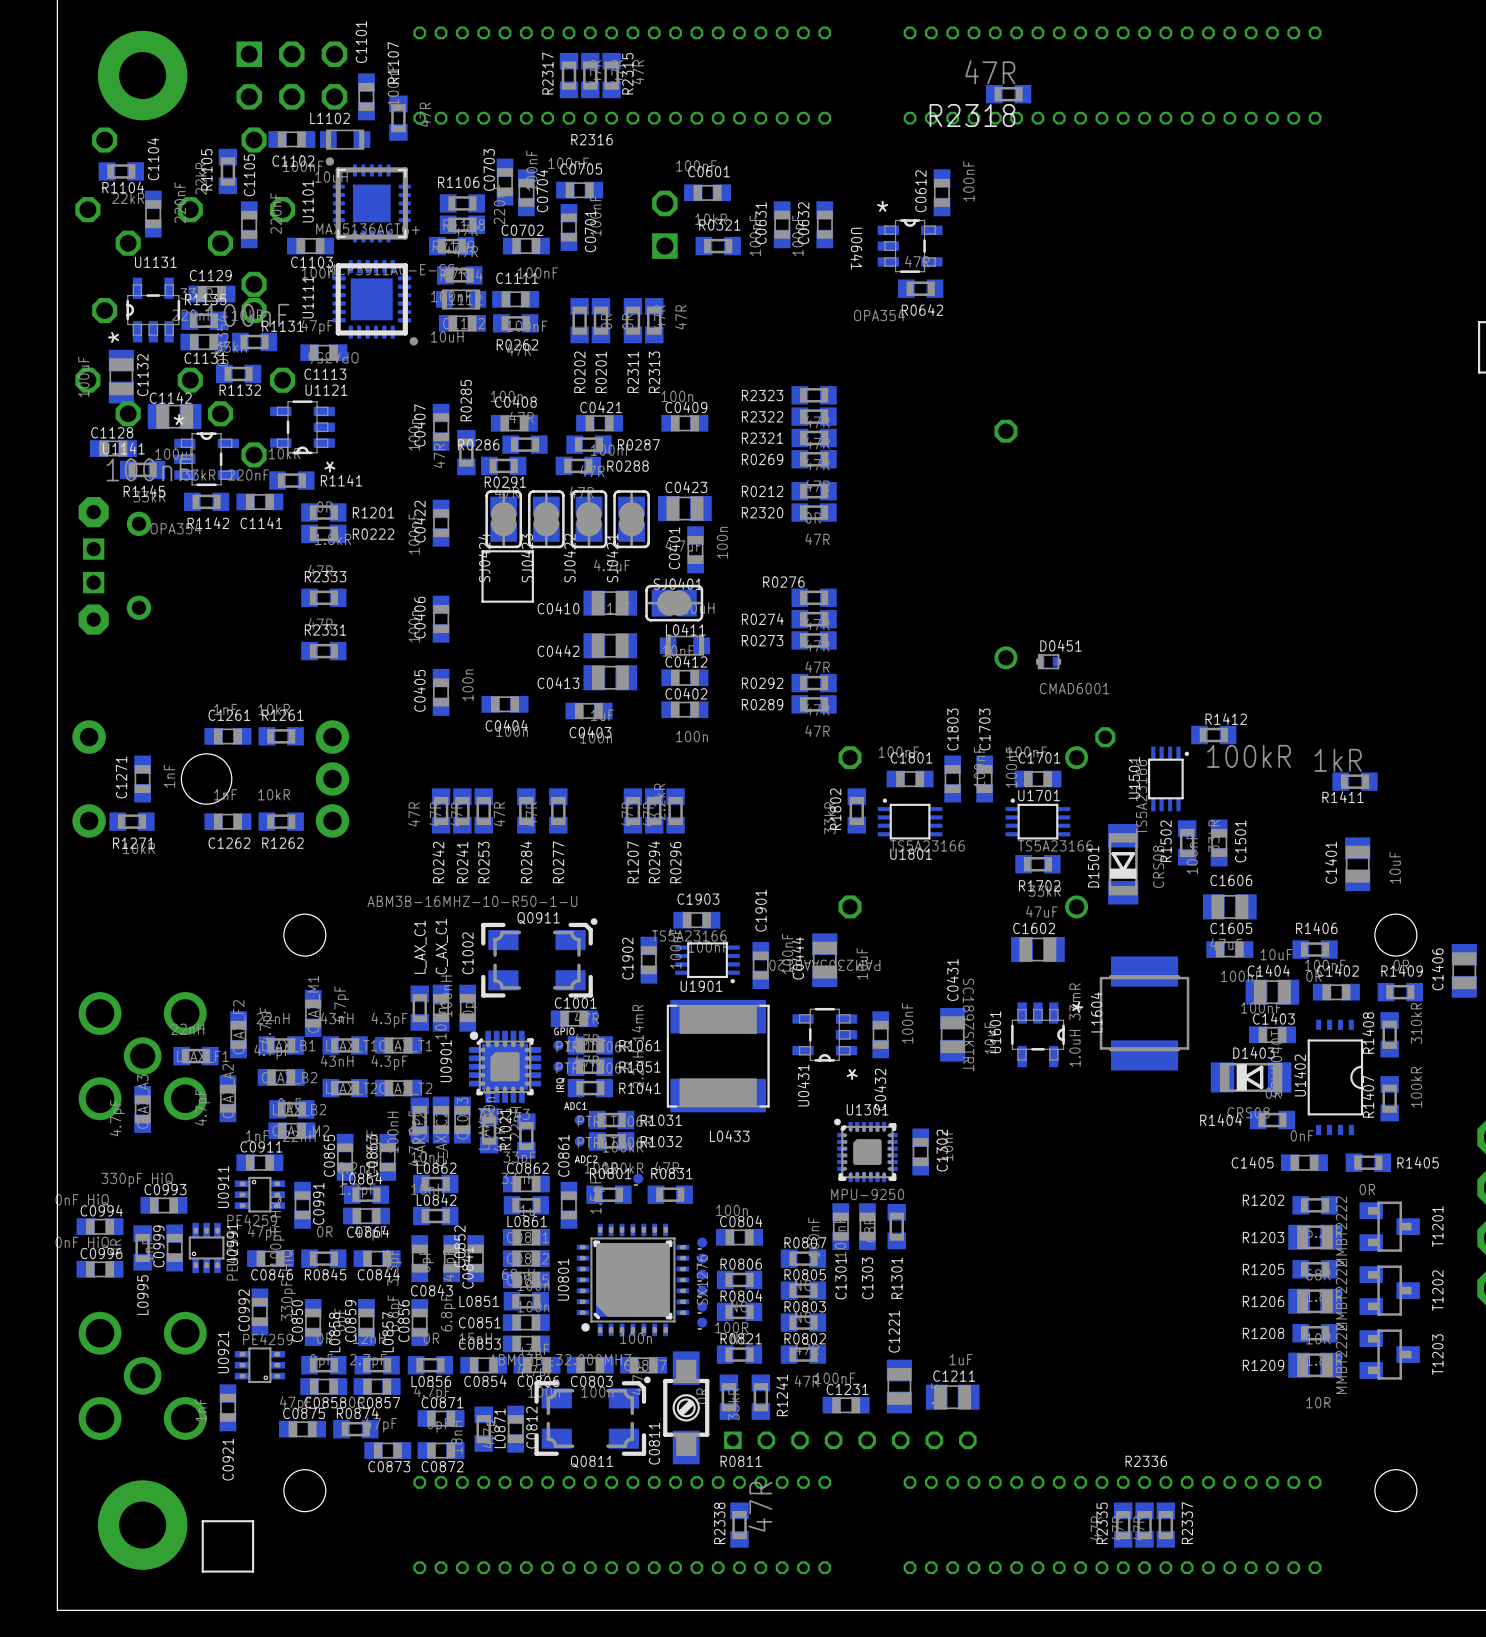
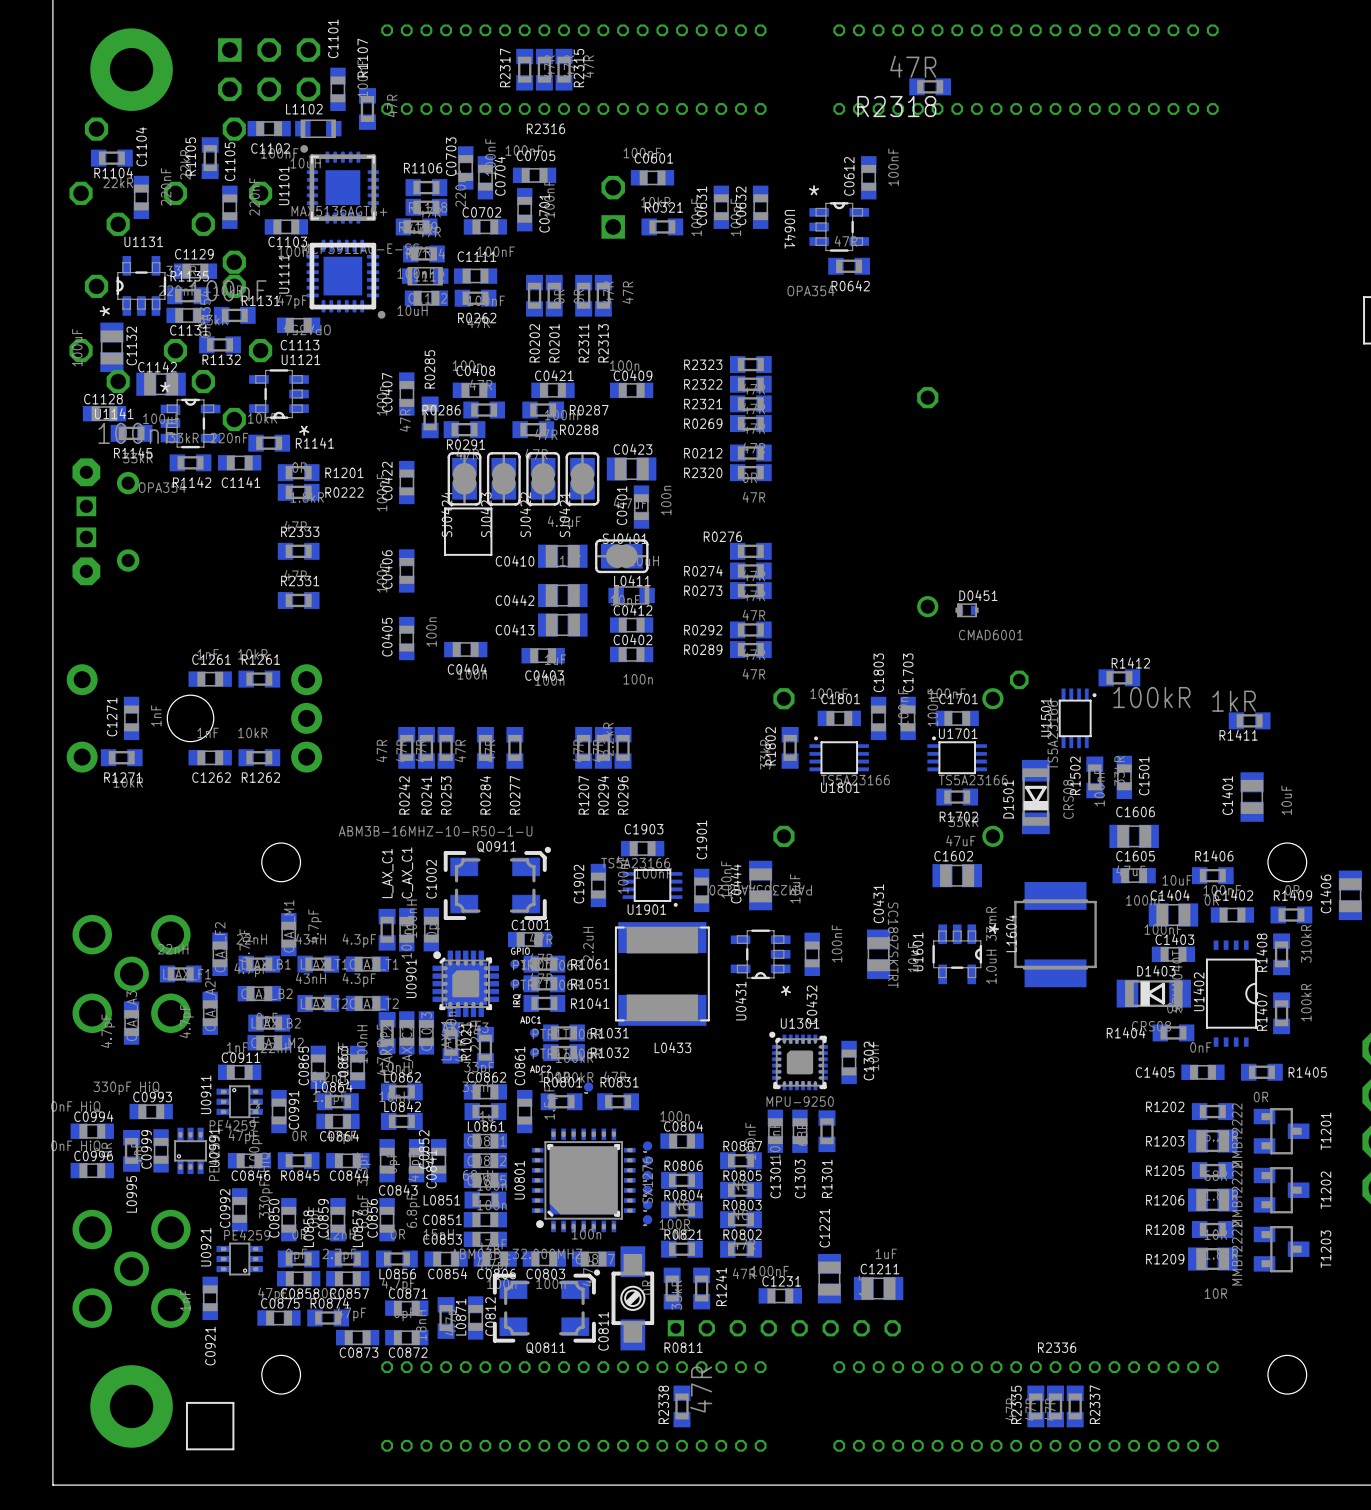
L0433 value: 2.2uH 14mR (637, 1046) -> 2.2uH (588, 944)

